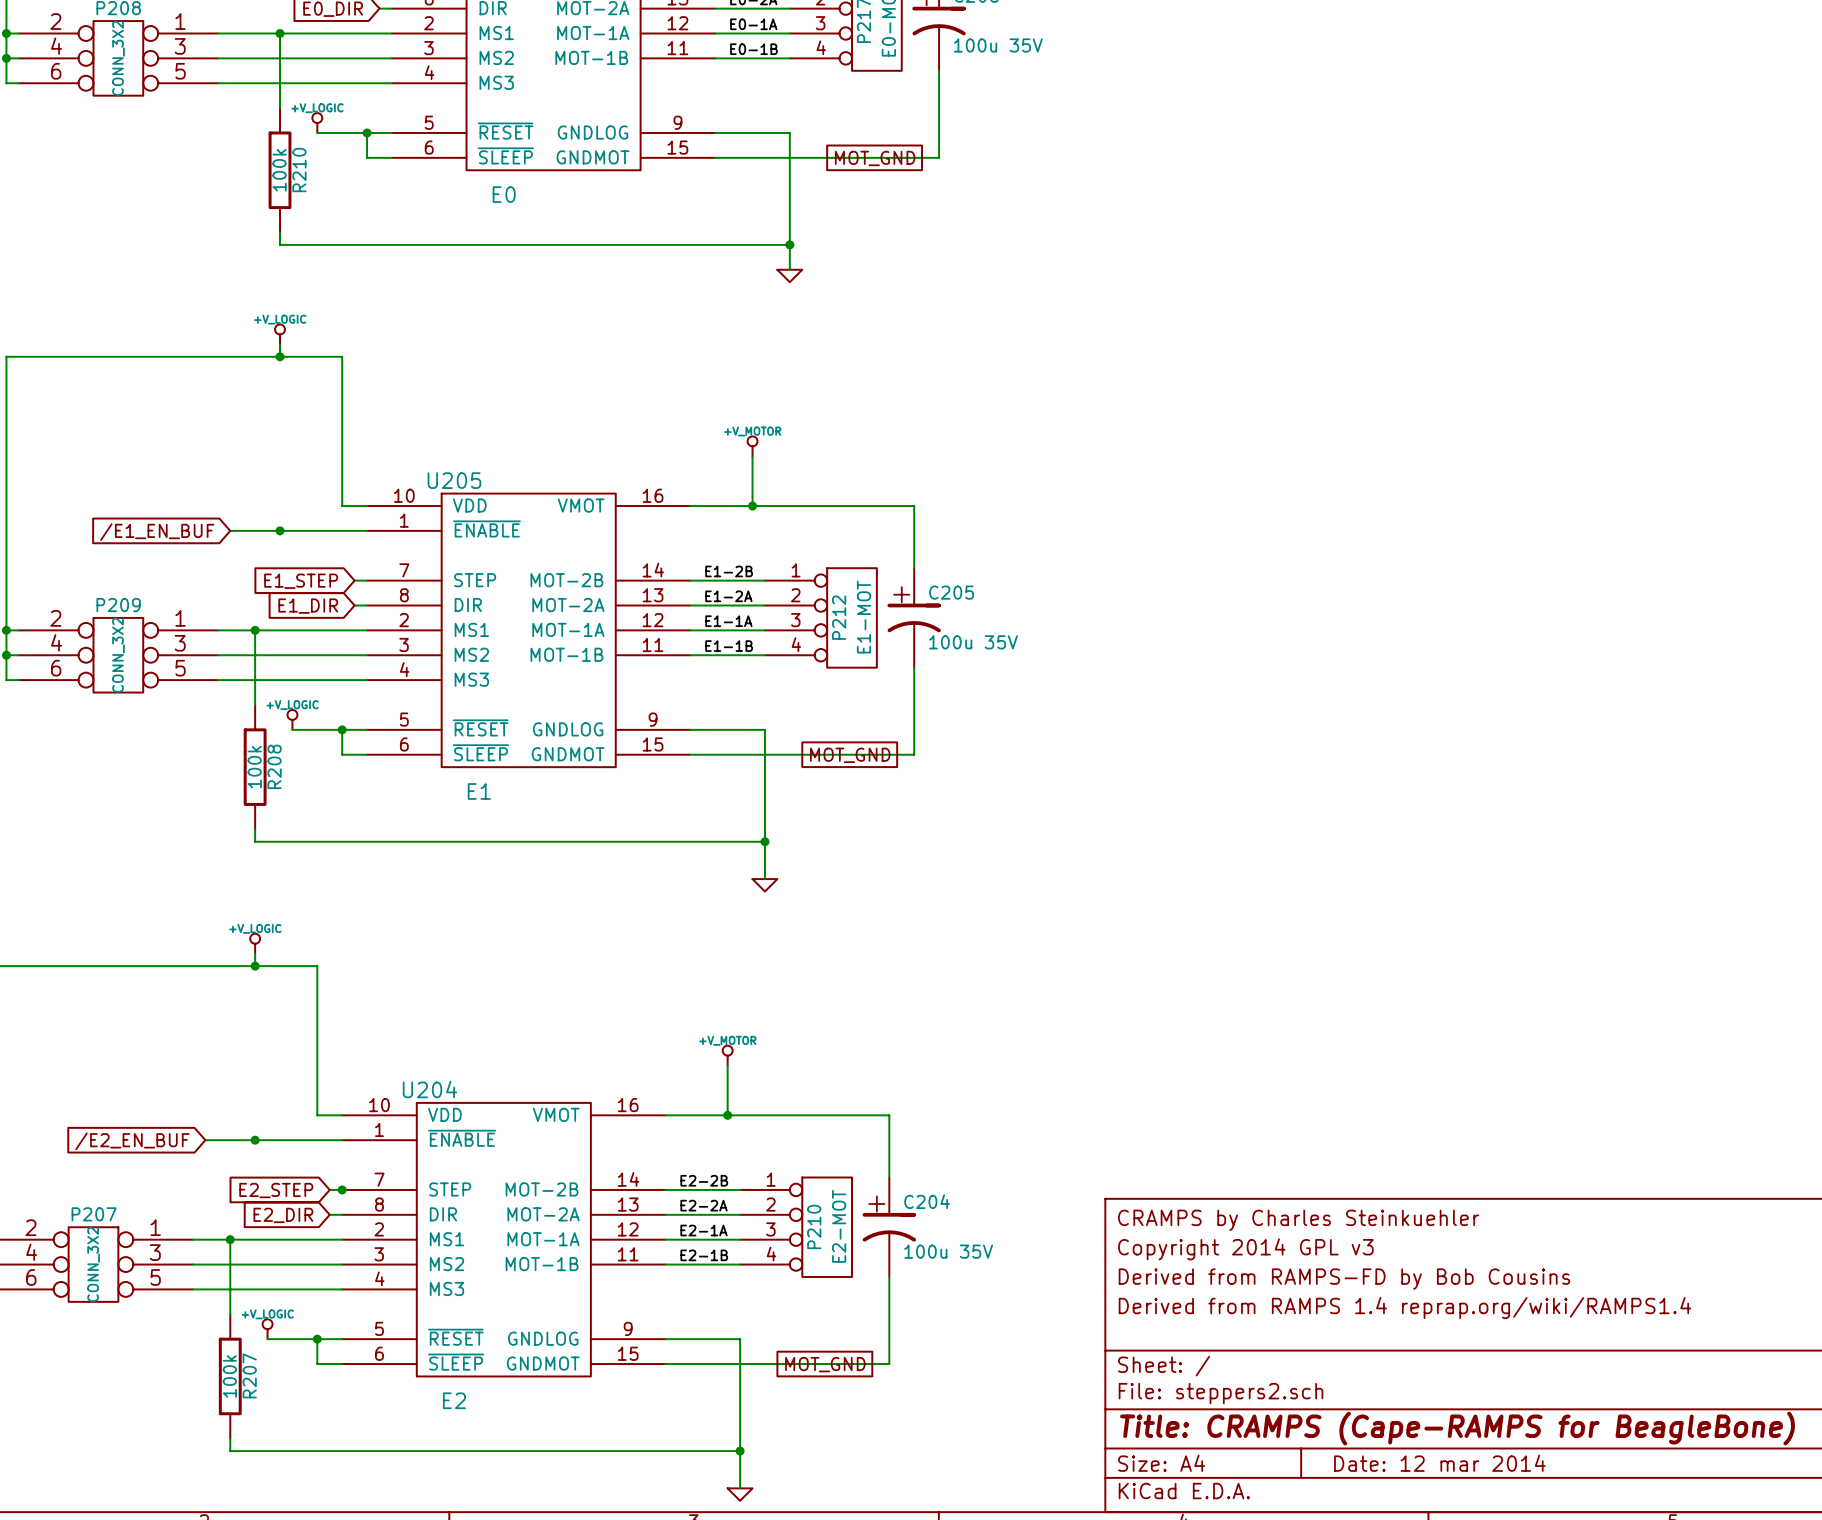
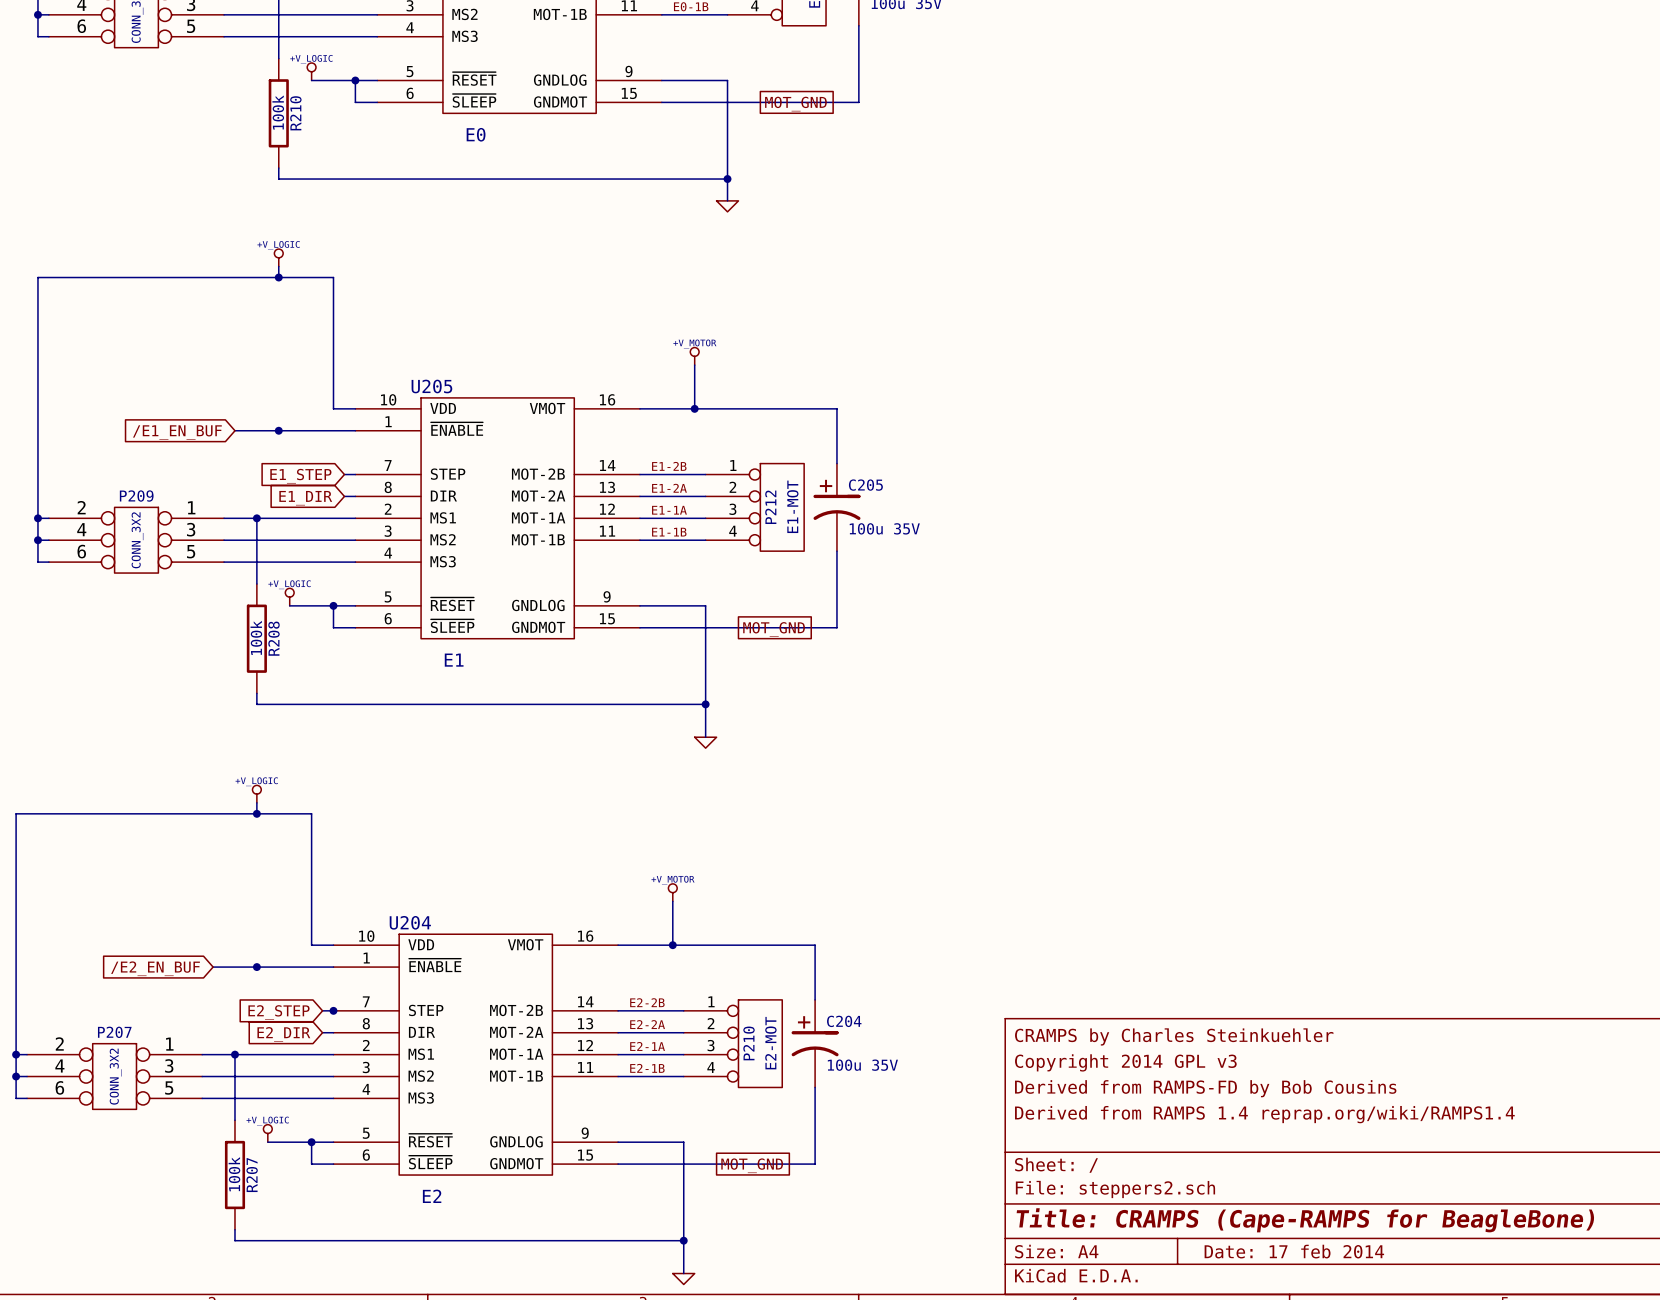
title block: Date: 12 mar 2014 (1439, 1463) -> Date: 17 feb 2014 (1294, 1251)

